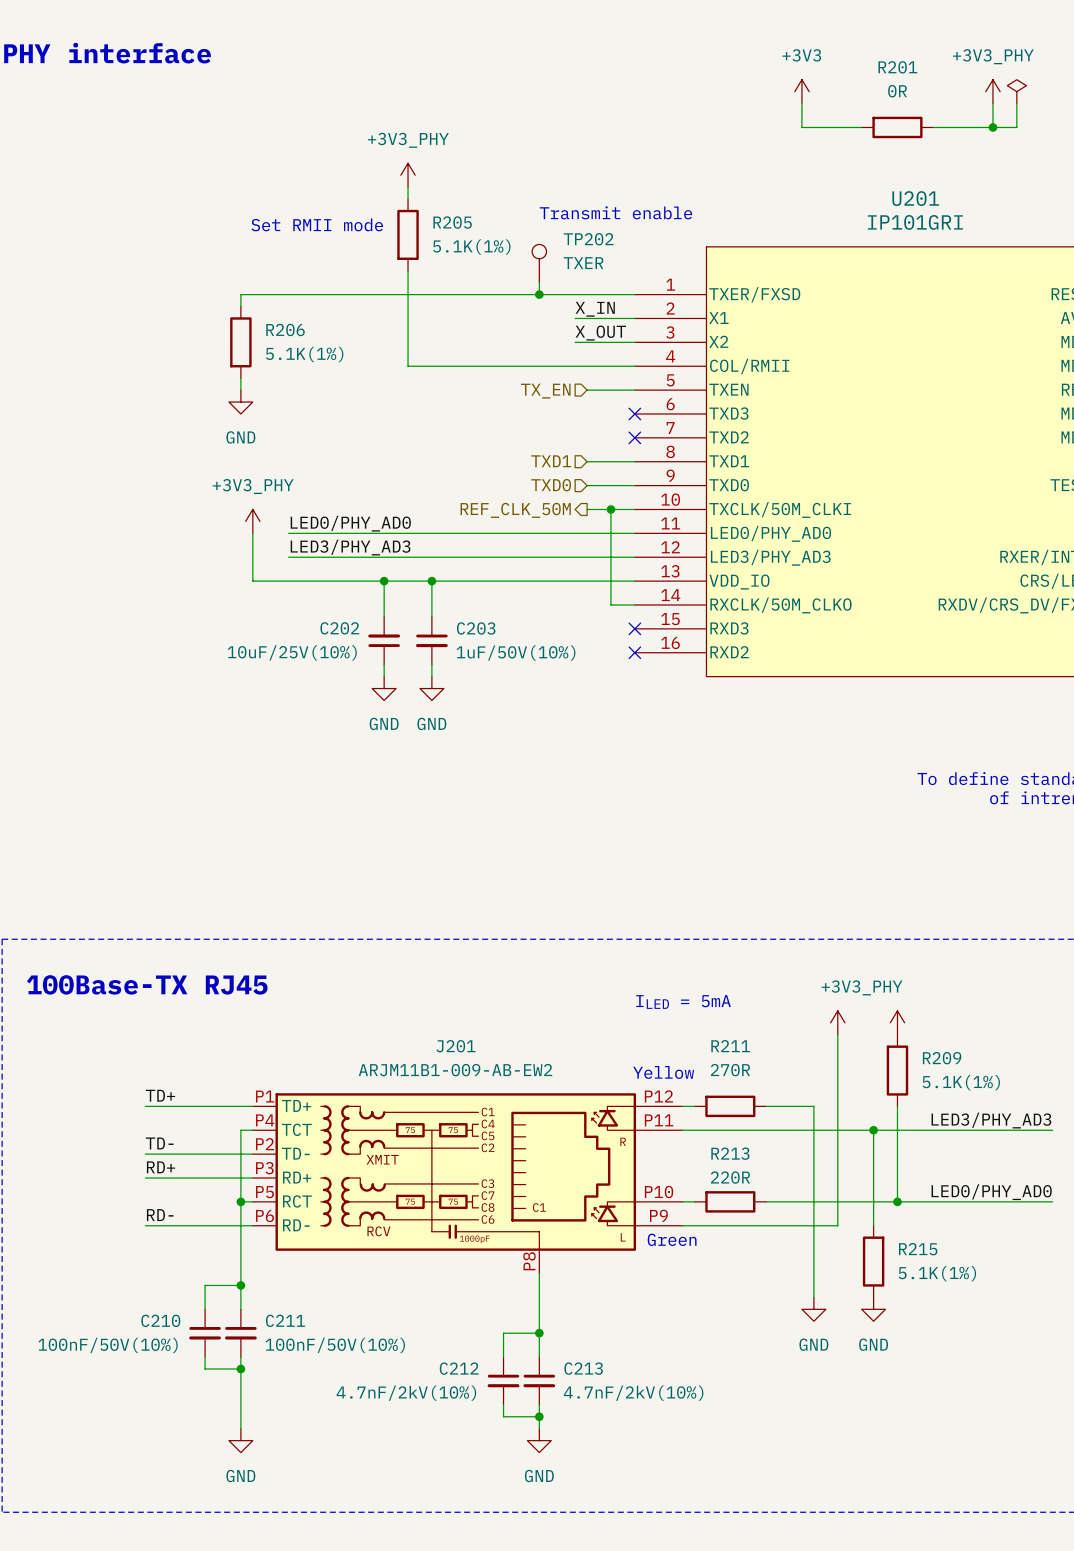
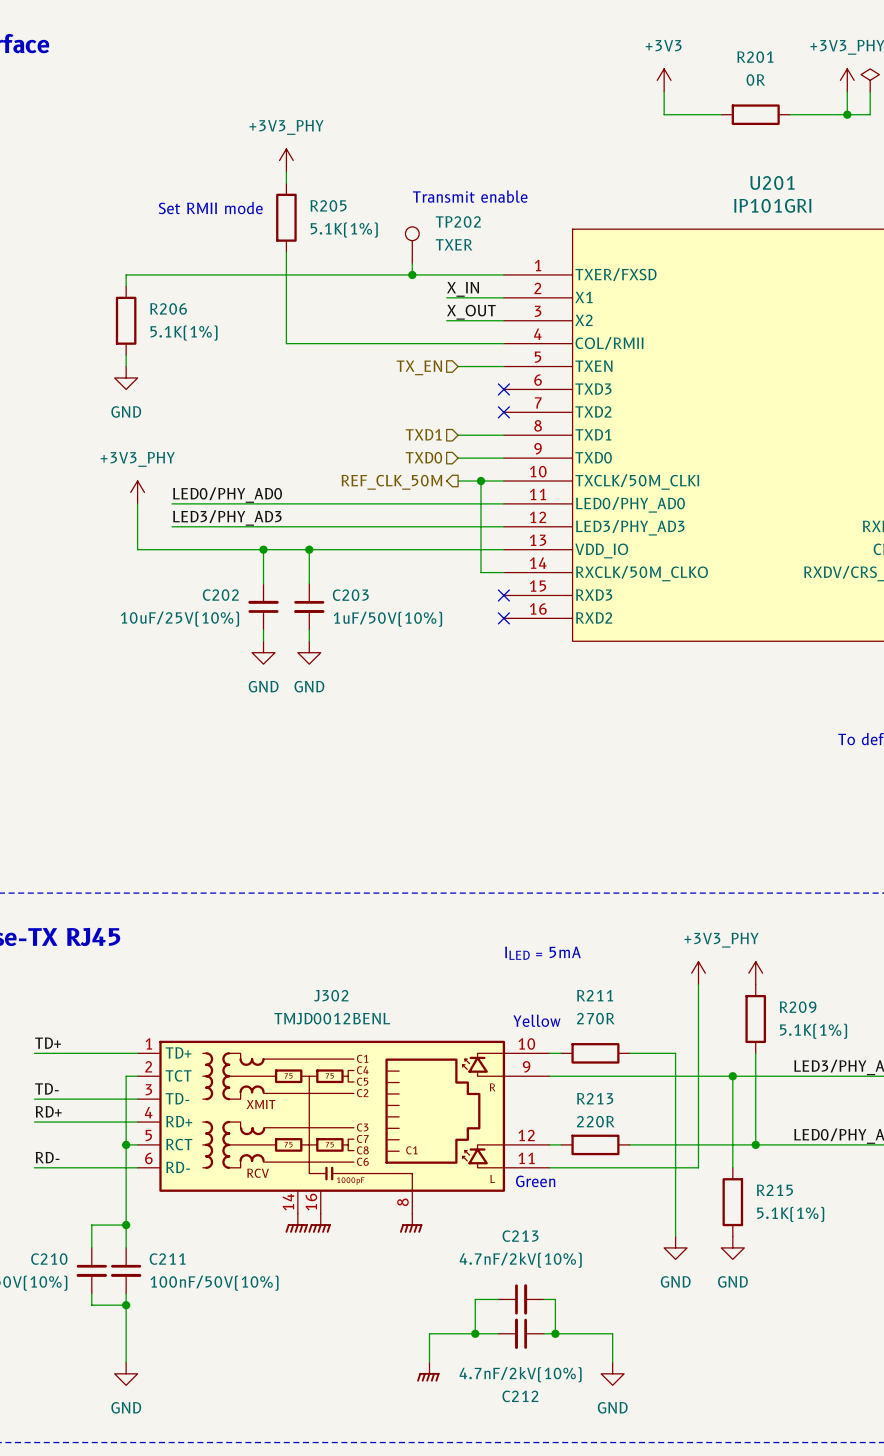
J201: ARJM11B1-009-AB-EW2 (467, 1183) -> none
J302: none -> TMJD0012BENL (343, 1127)
wire: (539, 1273) (539, 1357) -> none
power symbol: none -> (296, 1223)
power symbol: none -> (319, 1223)
power symbol: none -> (411, 1223)
wire: (539, 1333) (503, 1333) (503, 1357) -> none
junction: (539, 1333) -> none
wire: none -> (498, 1299) (475, 1299) (475, 1333)
wire: none -> (543, 1299) (555, 1299) (555, 1333)
C212 name position: C212 (459, 1368) -> C212 (520, 1396)
C213 name position: C213 (583, 1368) -> C213 (520, 1236)
C212 position: (503, 1380) -> (521, 1333)
C213 position: (539, 1380) -> (521, 1299)
C212 rotation: 0° (503, 1381) -> 90° clockwise (521, 1333)
C213 rotation: 0° (539, 1381) -> 90° counterclockwise (521, 1299)
C212 value position: 4.7nF/2kV(10%) (406, 1393) -> 4.7nF/2kV(10%) (520, 1374)
C213 value position: 4.7nF/2kV(10%) (633, 1393) -> 4.7nF/2kV(10%) (520, 1260)
junction: none -> (475, 1333)
wire: none -> (498, 1333) (429, 1333) (429, 1362)
wire: none -> (543, 1333) (612, 1333) (612, 1362)
junction: none -> (555, 1333)
wire: (503, 1404) (503, 1416) (539, 1416) -> none
wire: (539, 1404) (539, 1428) -> none
junction: (539, 1416) -> none
power symbol: none -> (428, 1372)
power symbol position: GND (539, 1440) -> GND (612, 1373)

